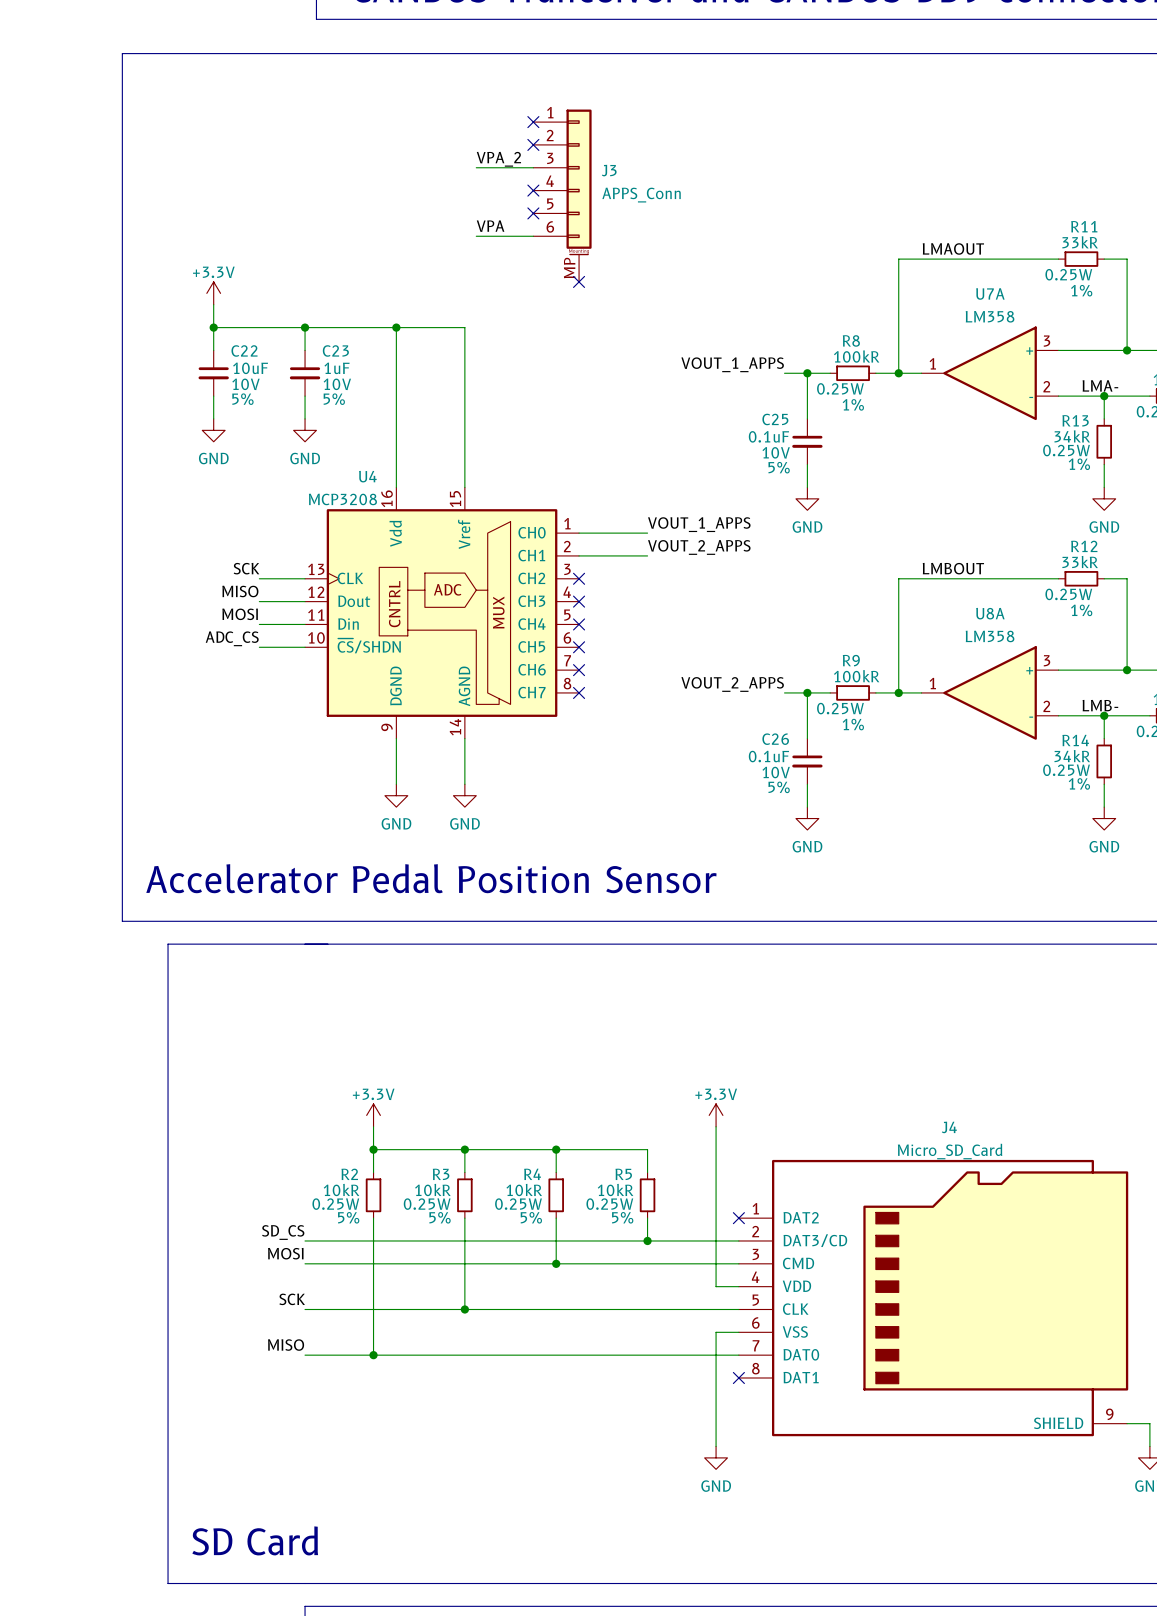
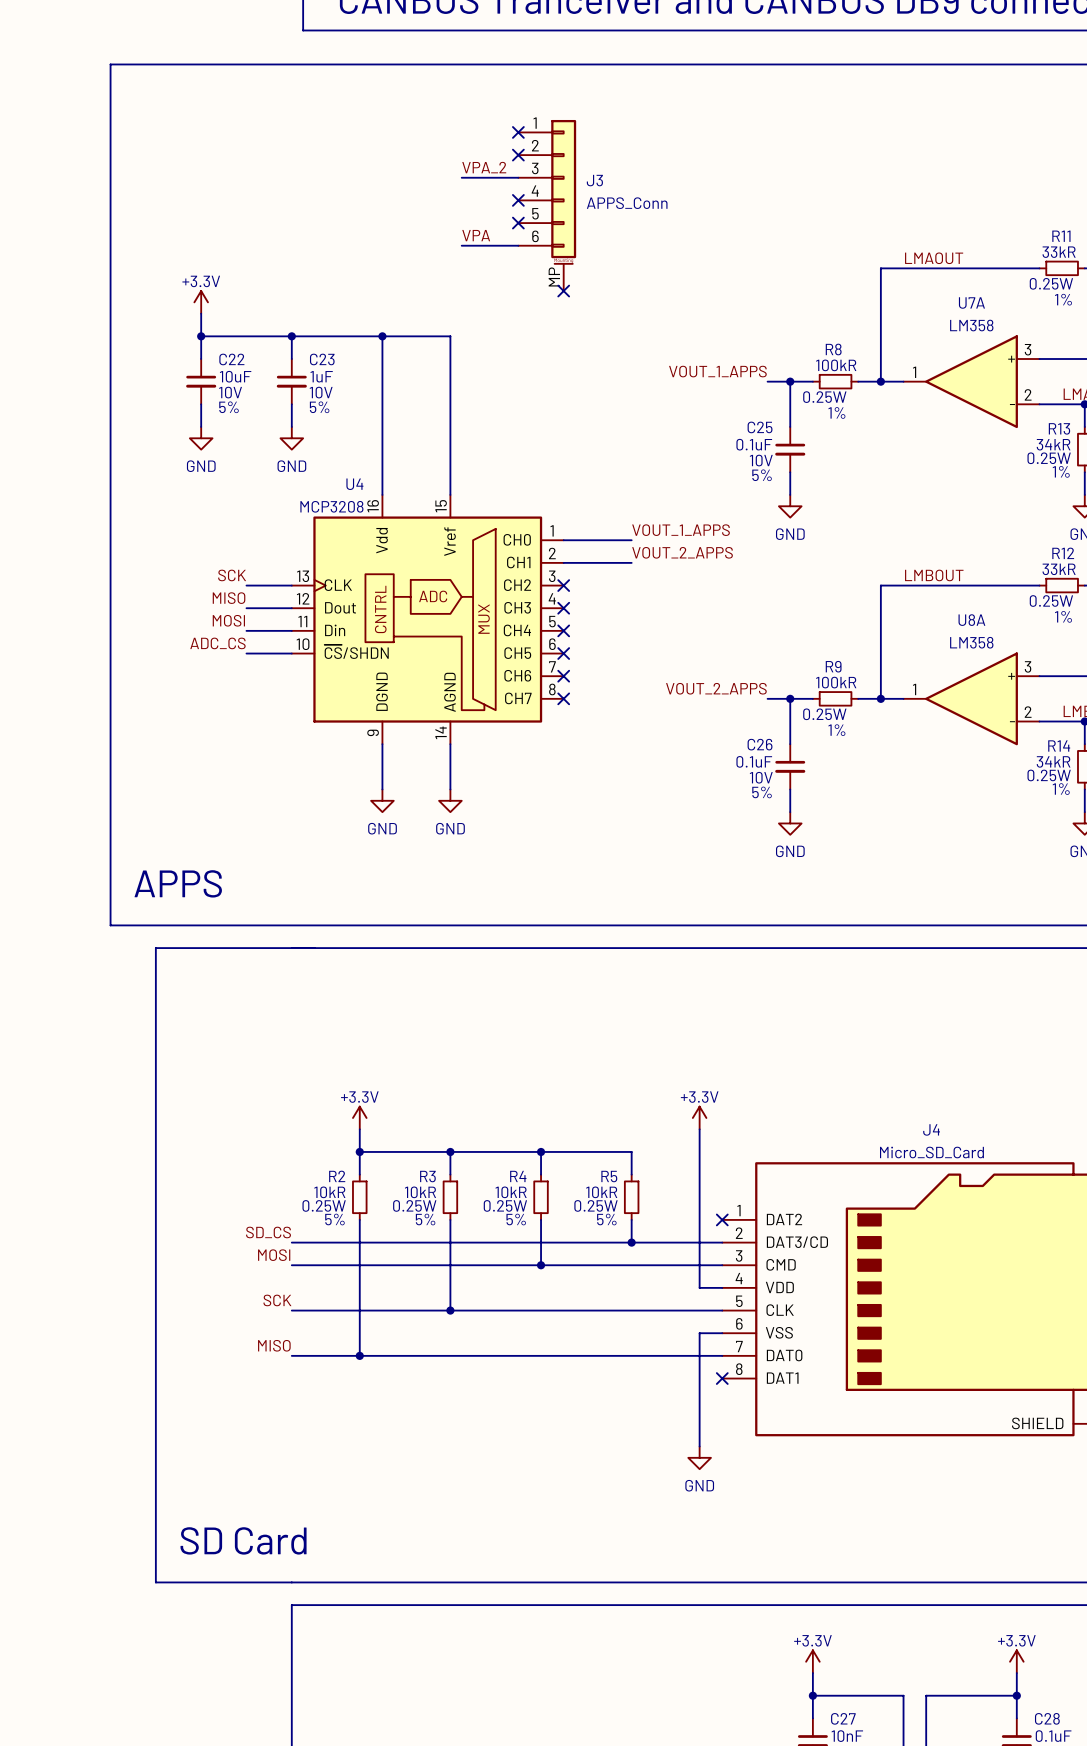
text: Accelerator Pedal Position Sensor (431, 878) -> APPS (178, 883)

